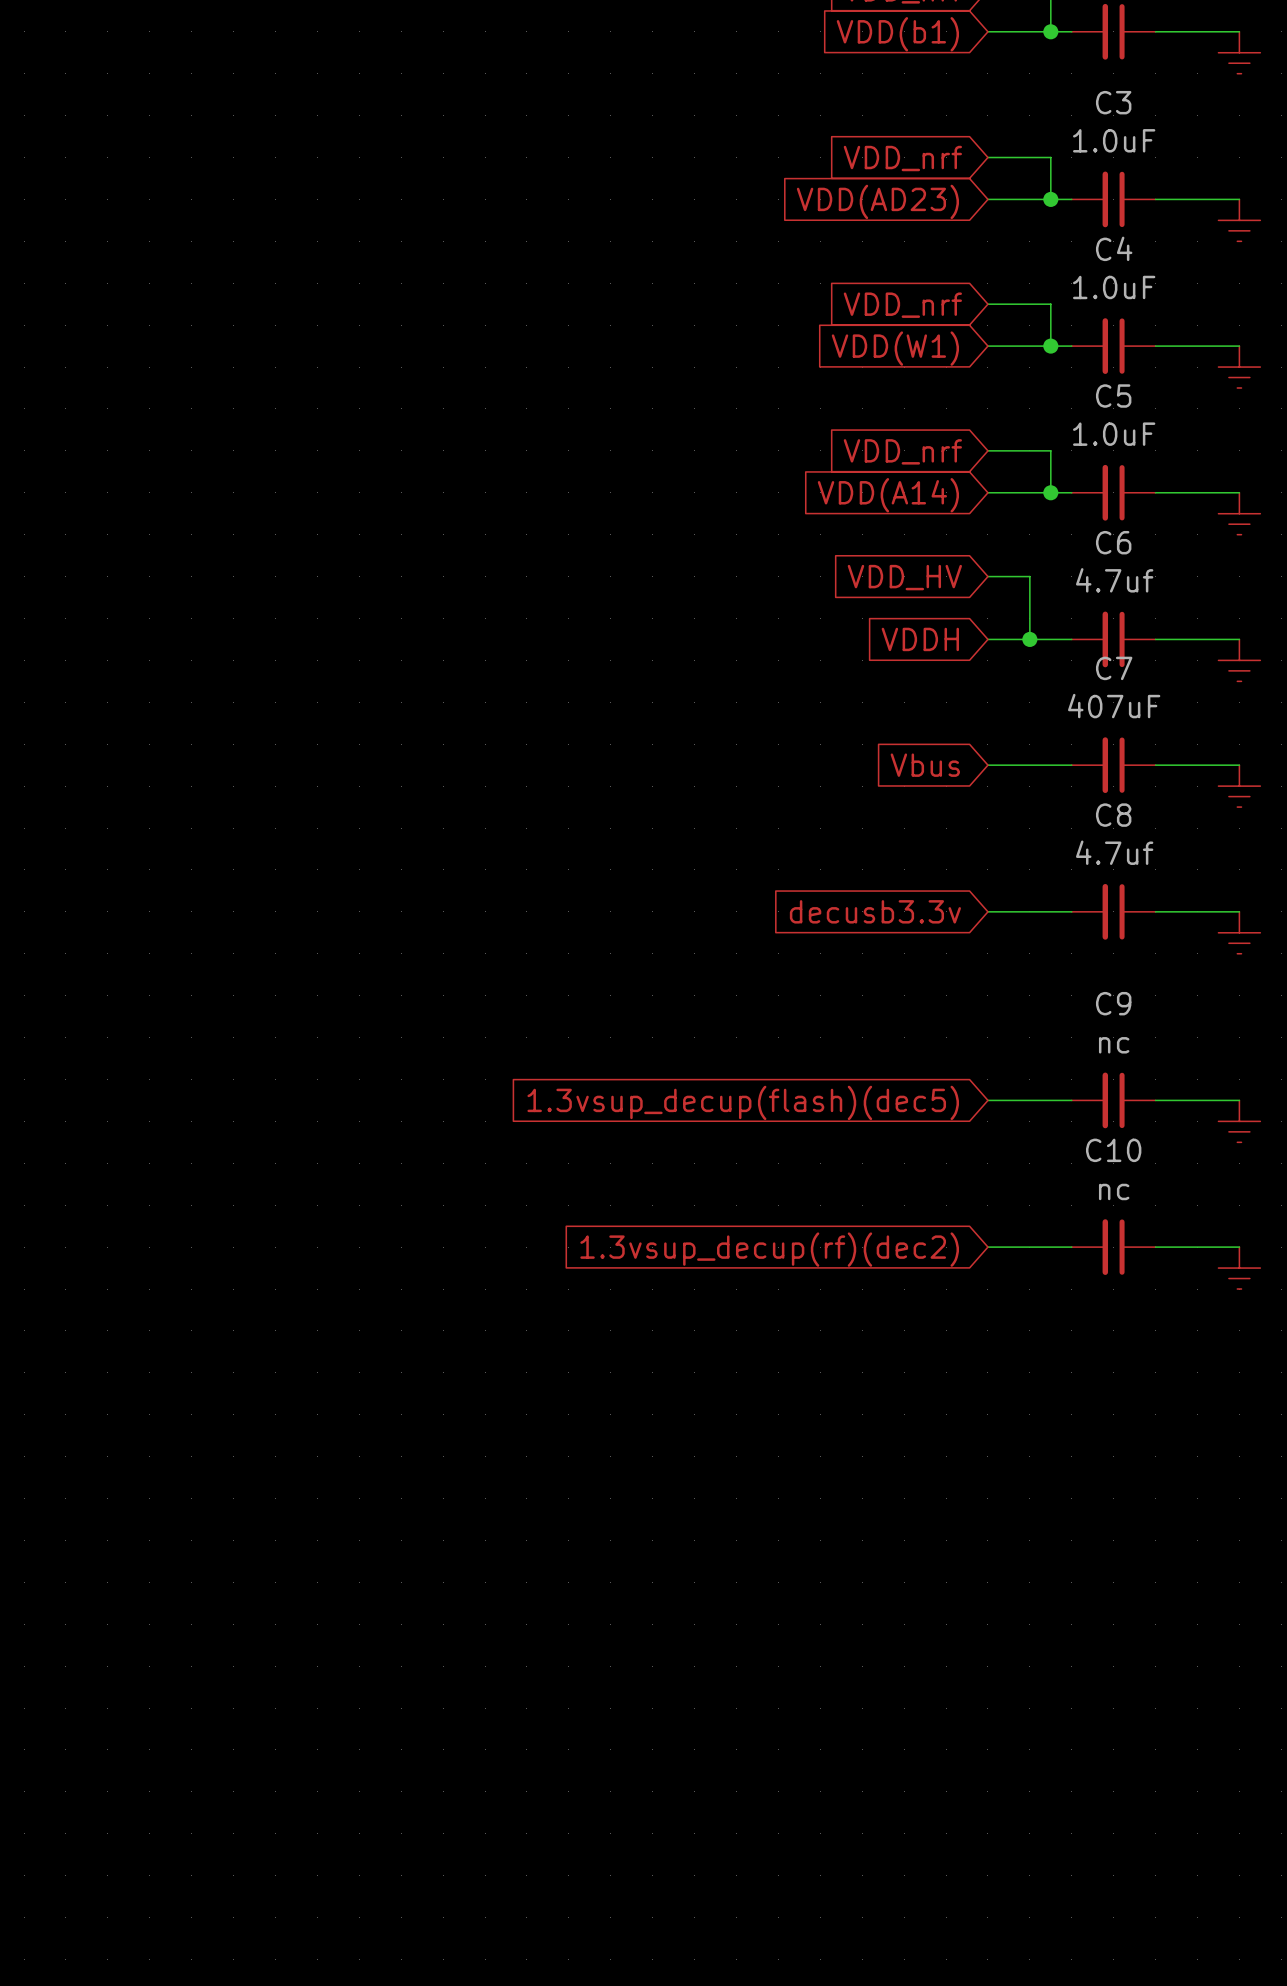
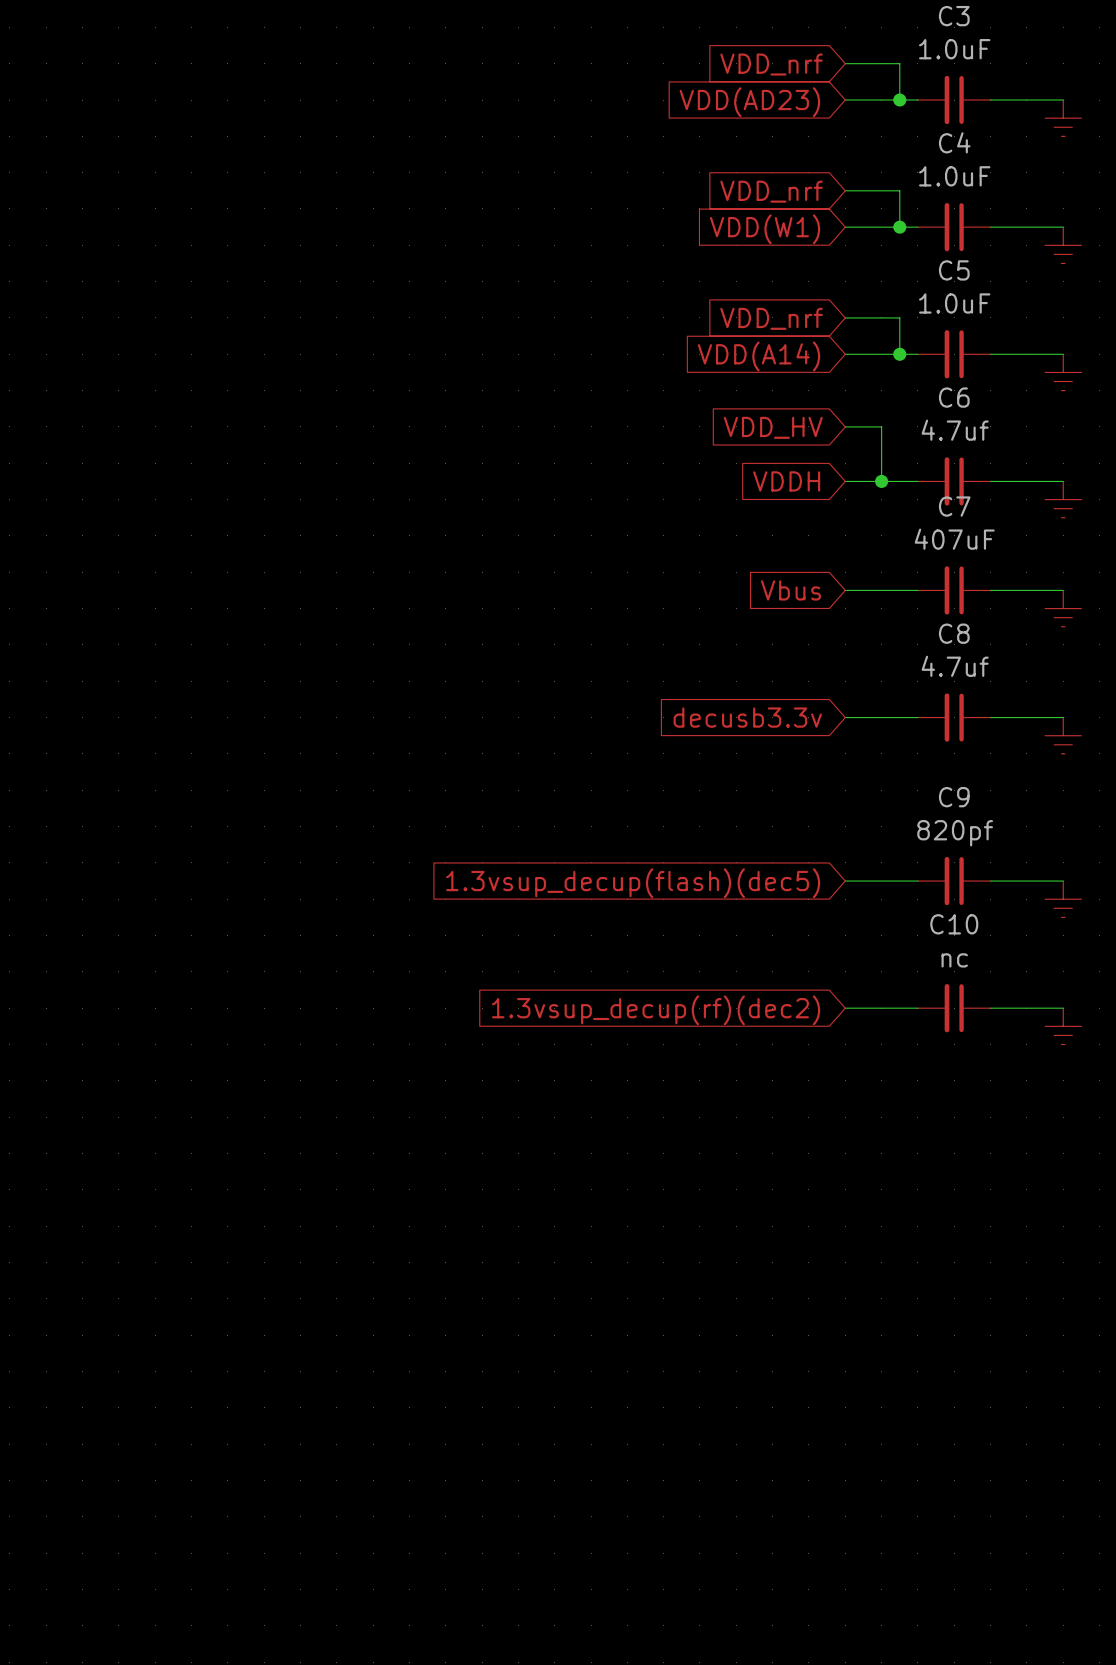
C9 value: nc (1114, 1045) -> 820pf (955, 833)

